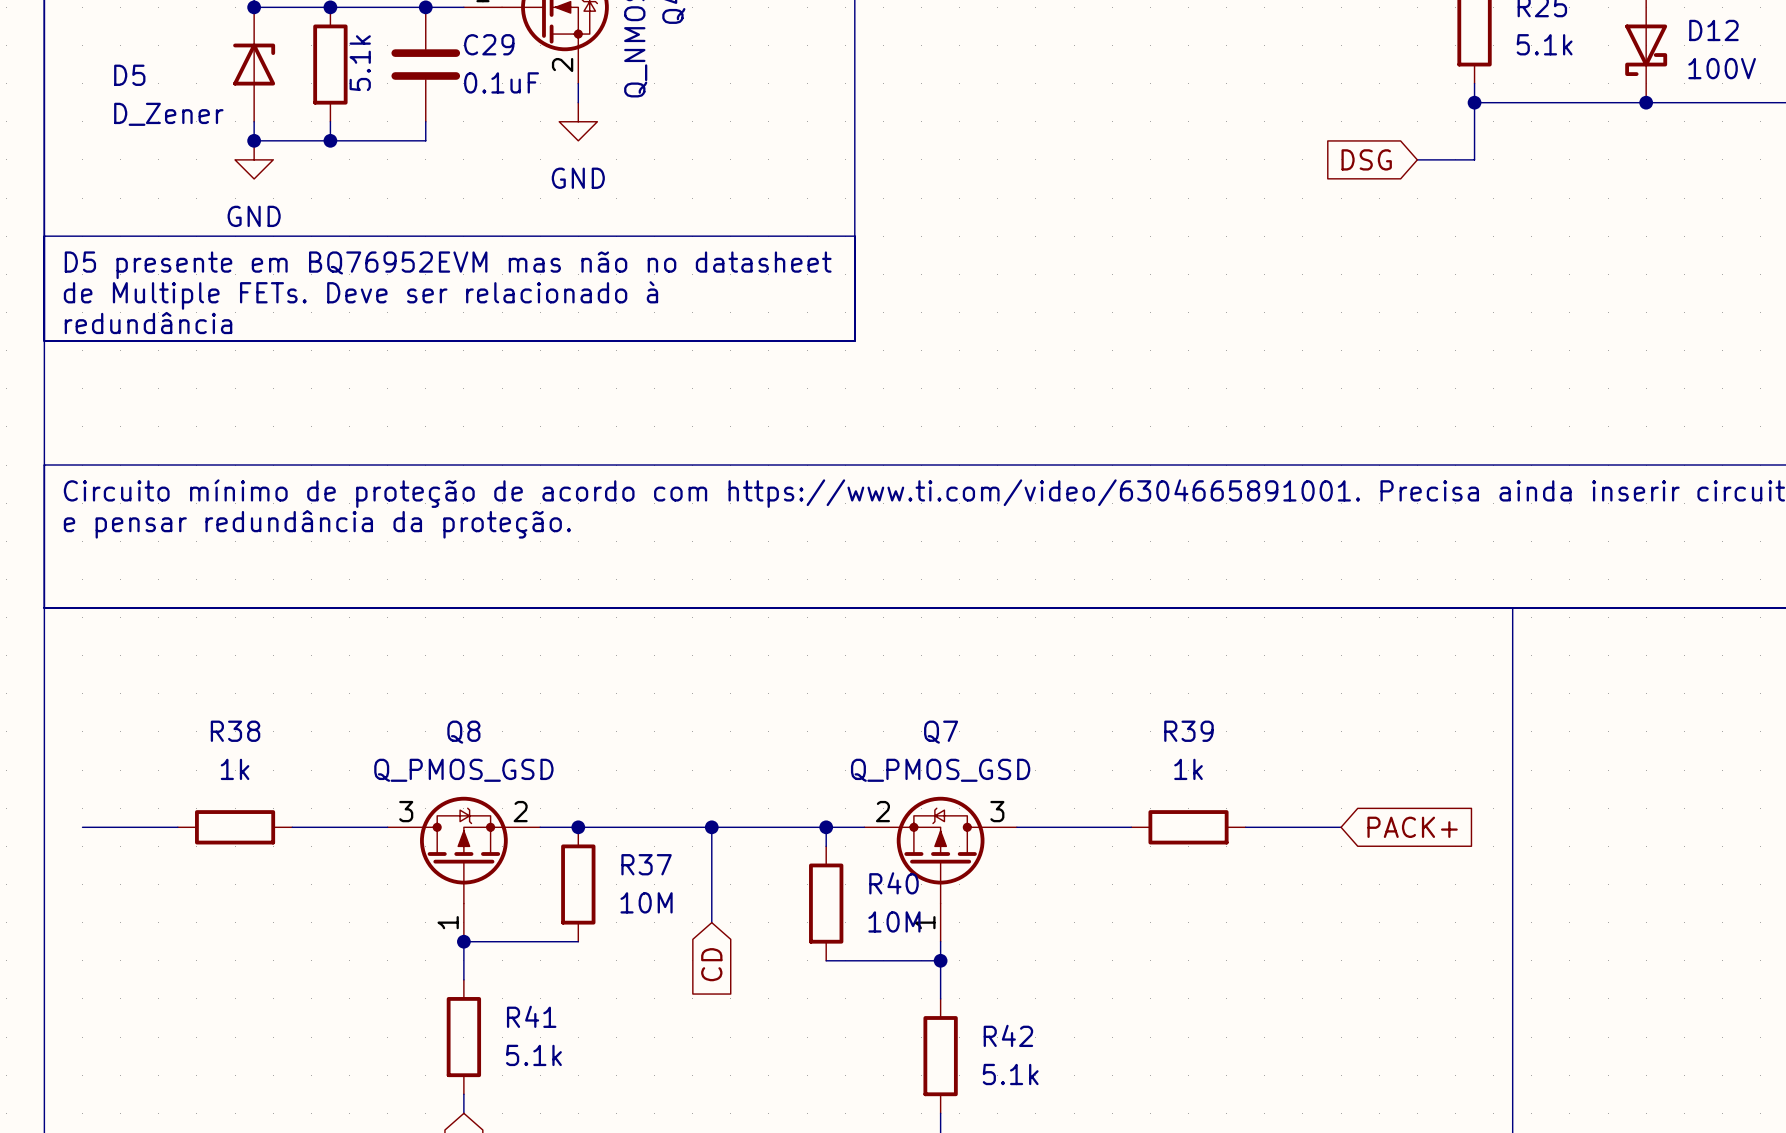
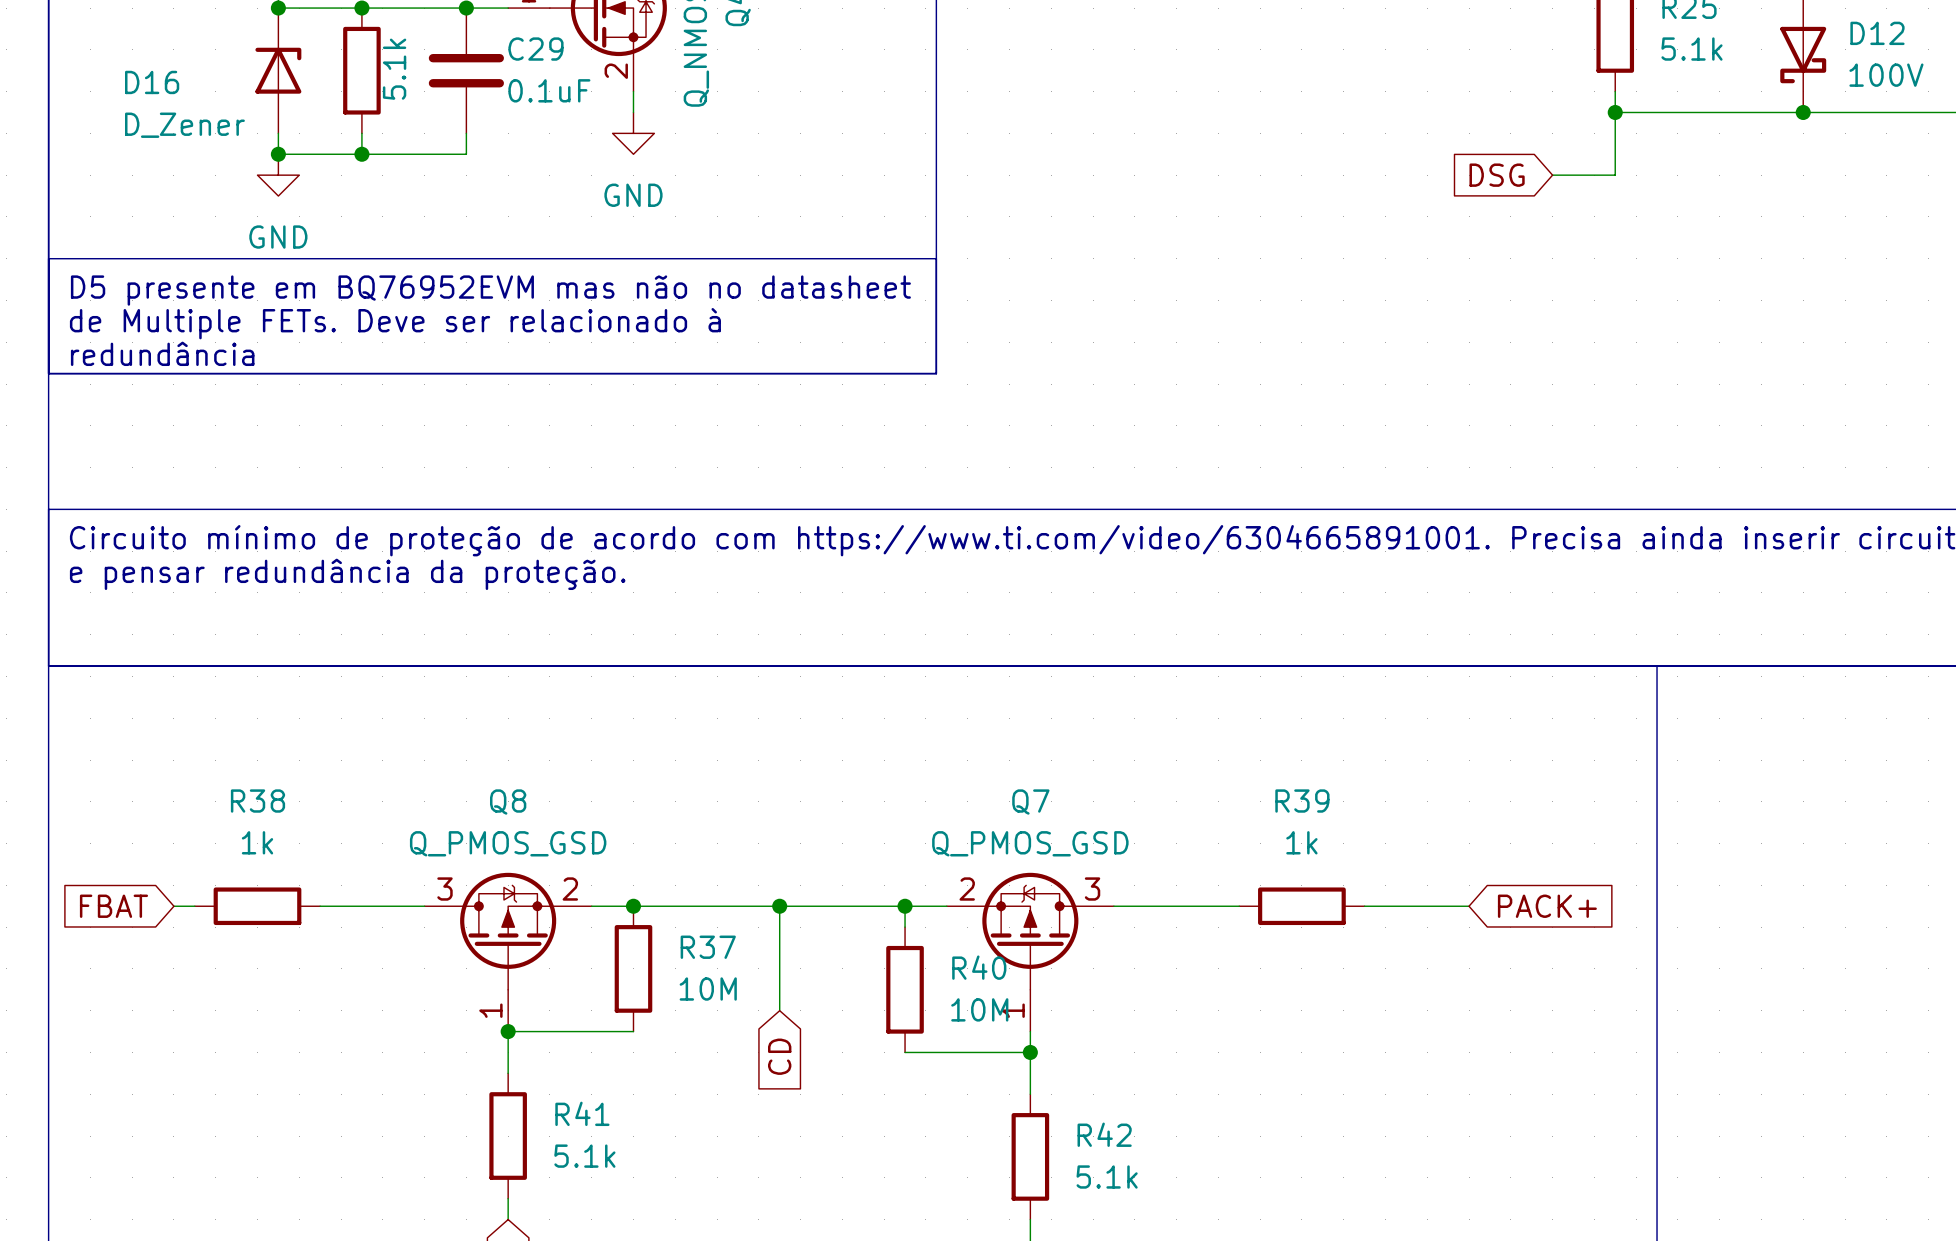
D5 name: D5 (129, 75) -> D16 (152, 82)
wire: (82, 827) (158, 827) -> none
global label: none -> FBAT (113, 906)

